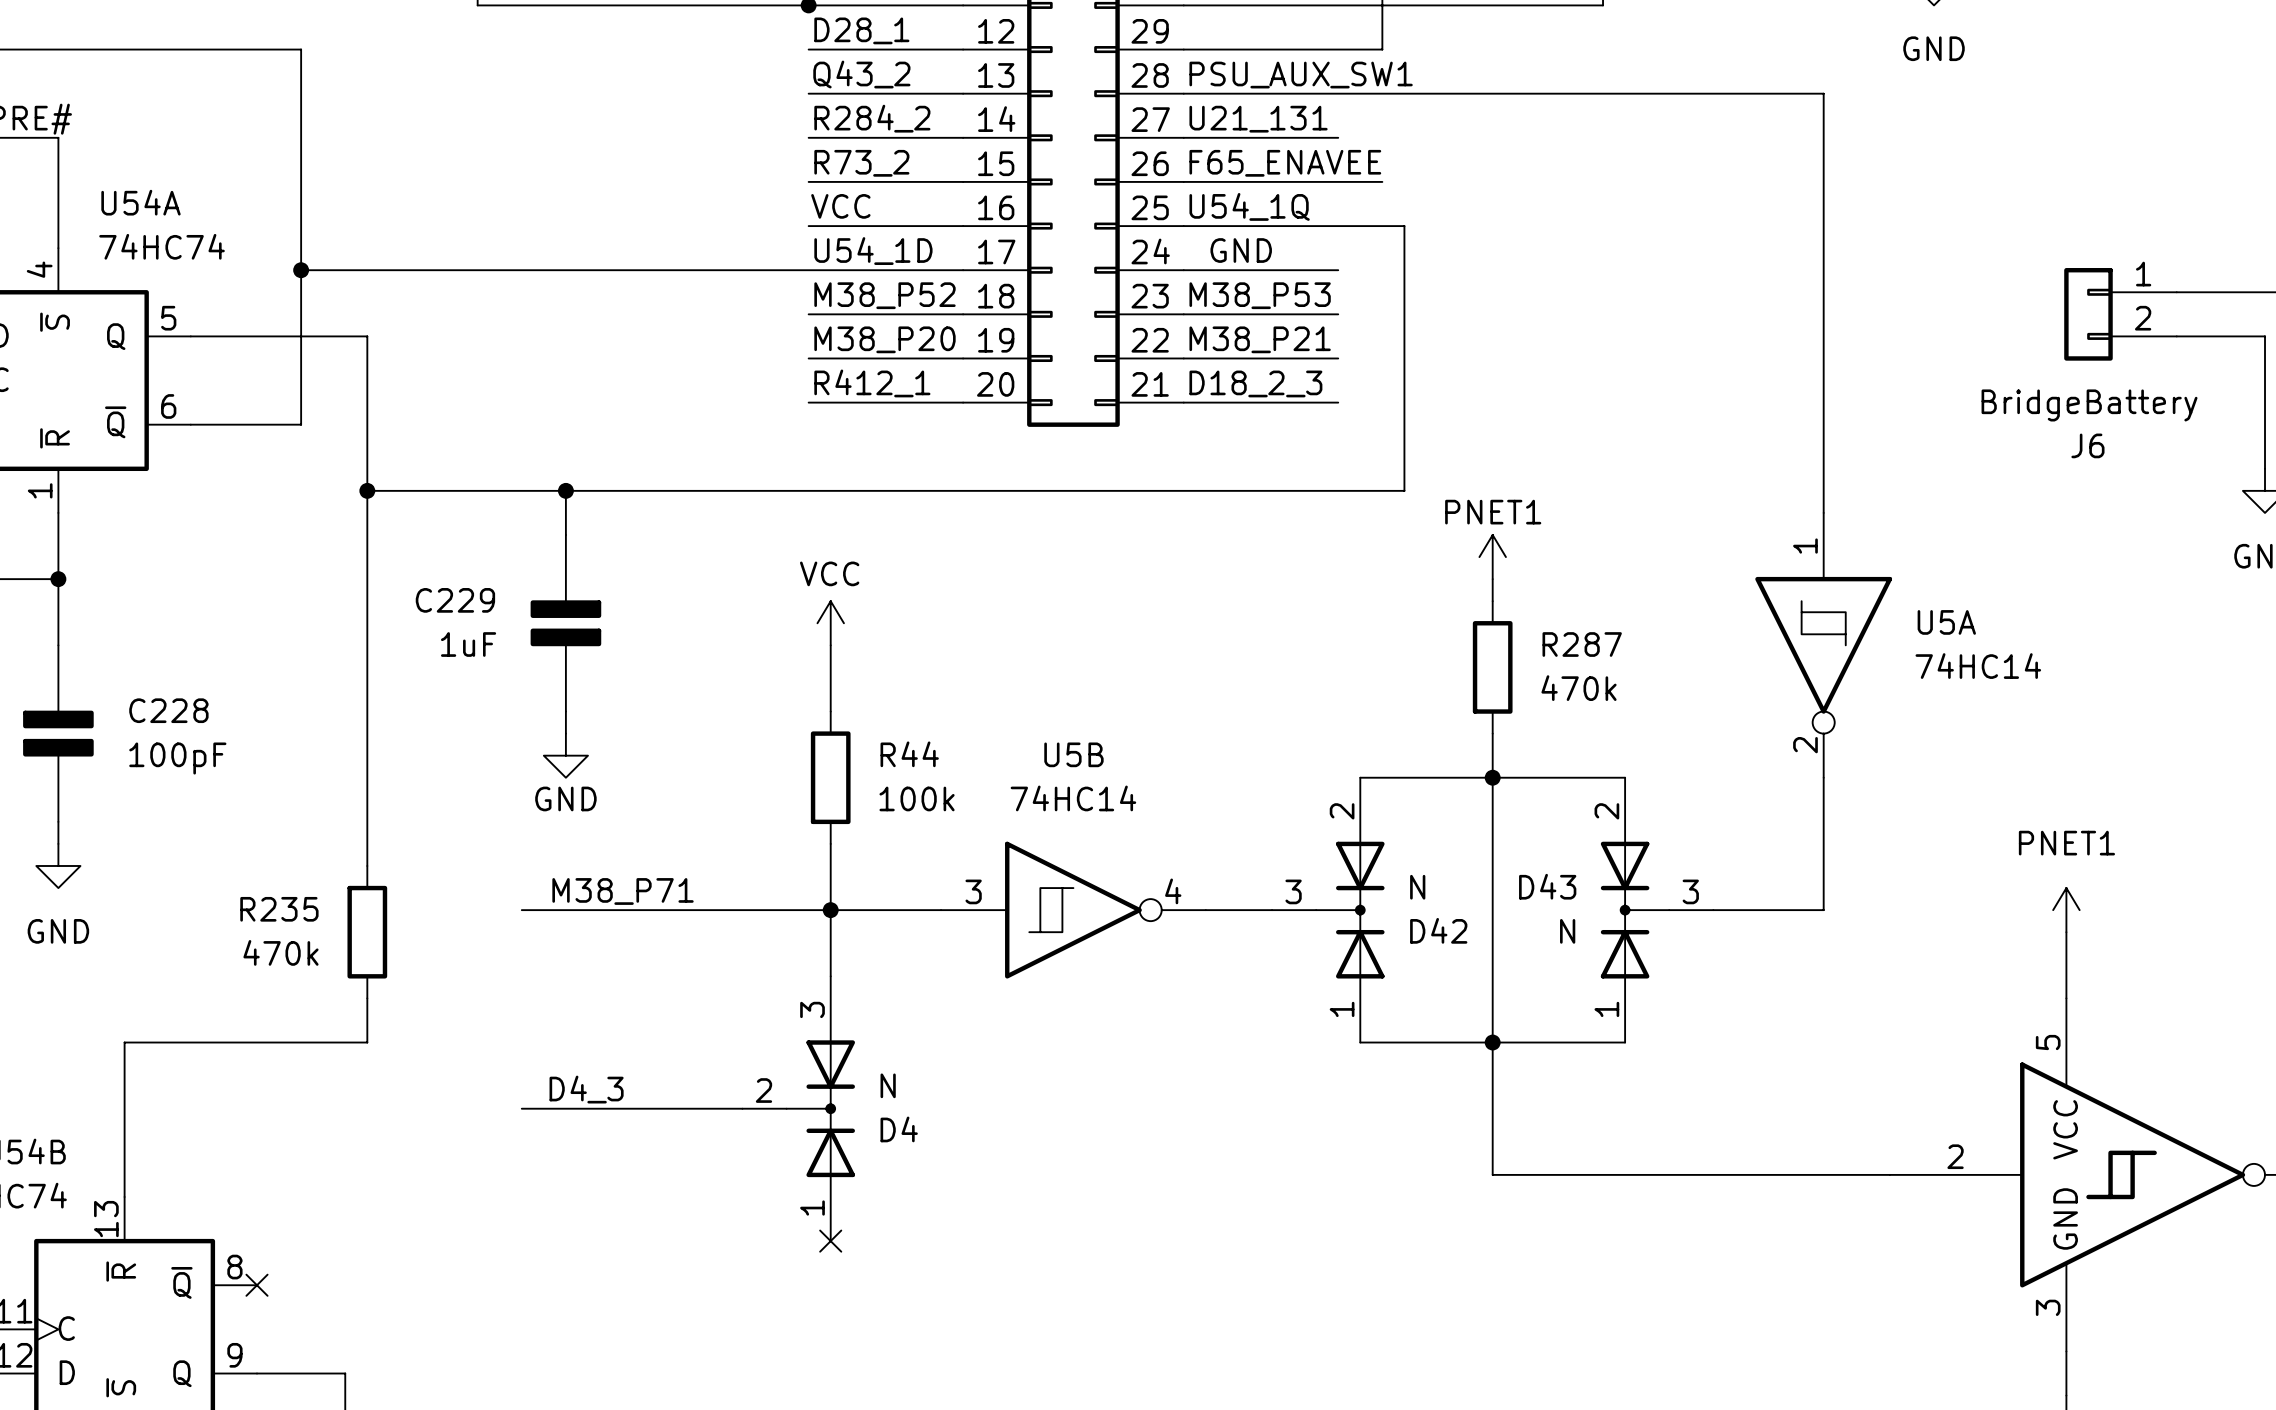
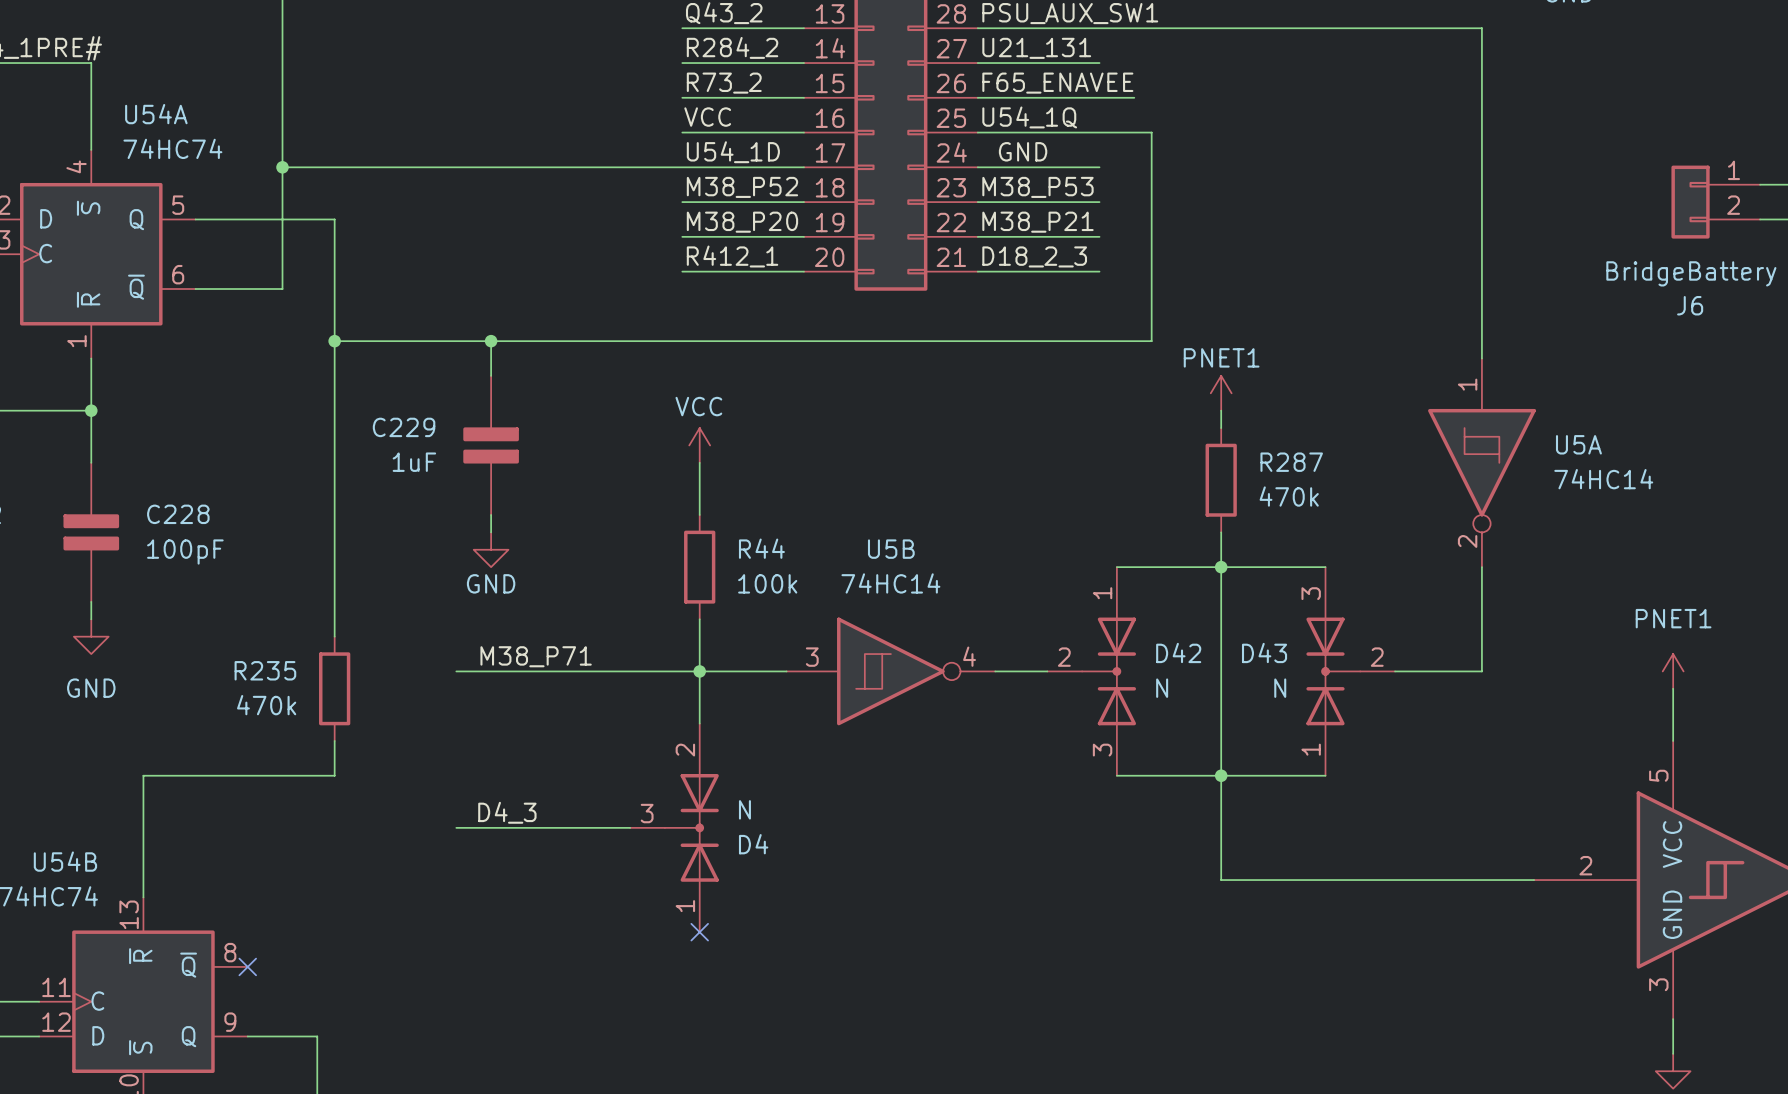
D42 symbol: [1272, 777, 1385, 1043] -> [1047, 567, 1137, 776]
D43 pin number: 2 (1606, 811) -> 3 (1311, 593)
D42 value position: N (1417, 887) -> N (1162, 688)
D43 pin number: 3 (1690, 891) -> 2 (1377, 657)
D42 name position: D42 (1438, 930) -> D42 (1178, 652)
D4 pin number: 3 (812, 1009) -> 2 (685, 750)
D4 pin number: 2 (763, 1090) -> 3 (647, 813)

